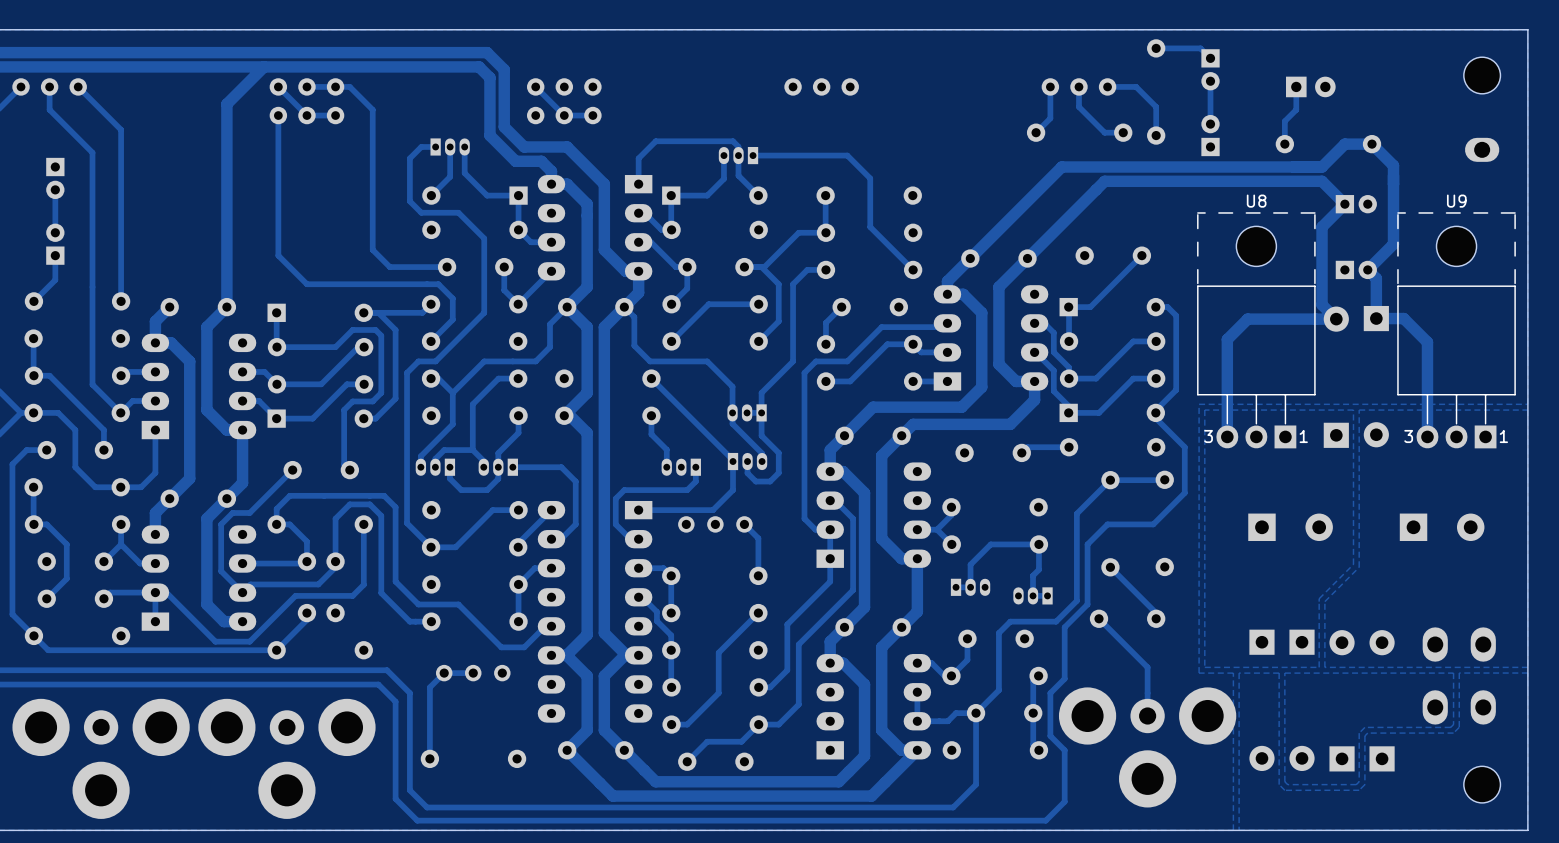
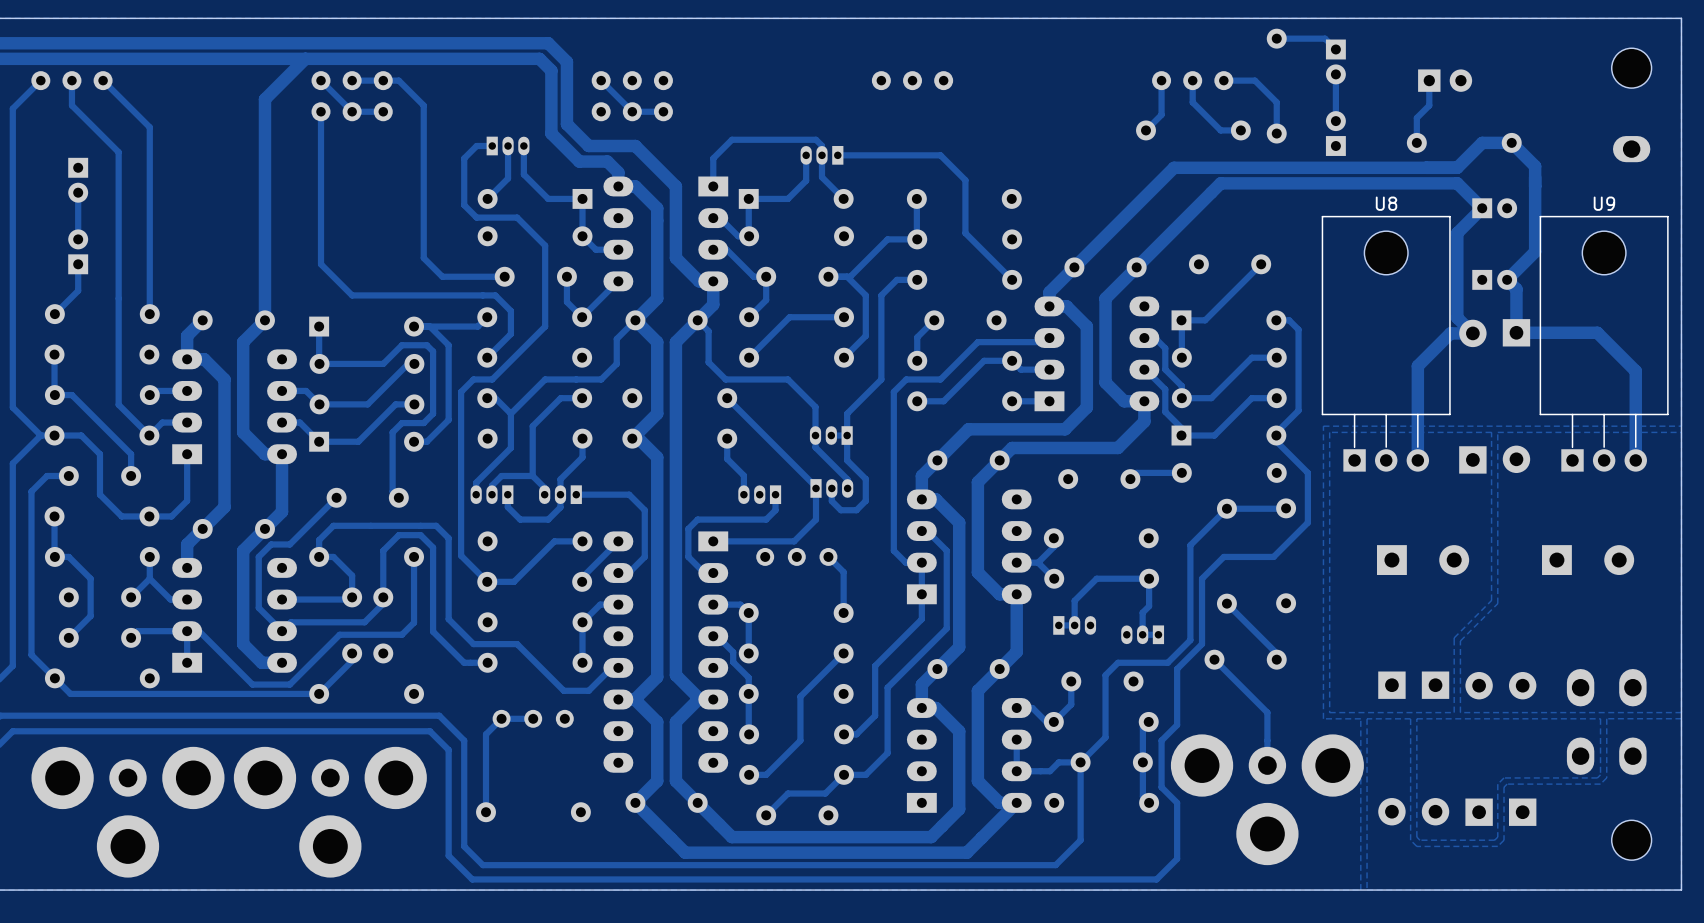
U8 footprint: [1197, 212, 1316, 449] -> [1321, 215, 1451, 472]
U9 footprint: [1397, 212, 1516, 449] -> [1539, 215, 1669, 472]
track: (1403, 318) (1427, 342) (1427, 436) -> (1546, 332) (1597, 332) (1635, 371) (1635, 460)
track: (1315, 319) (1247, 319) (1227, 339) (1227, 436) -> (1450, 333) (1417, 366) (1417, 460)
text: 3 (1208, 436) -> none
text: 1 (1303, 436) -> none
text: 3 (1408, 436) -> none
text: 1 (1503, 436) -> none

